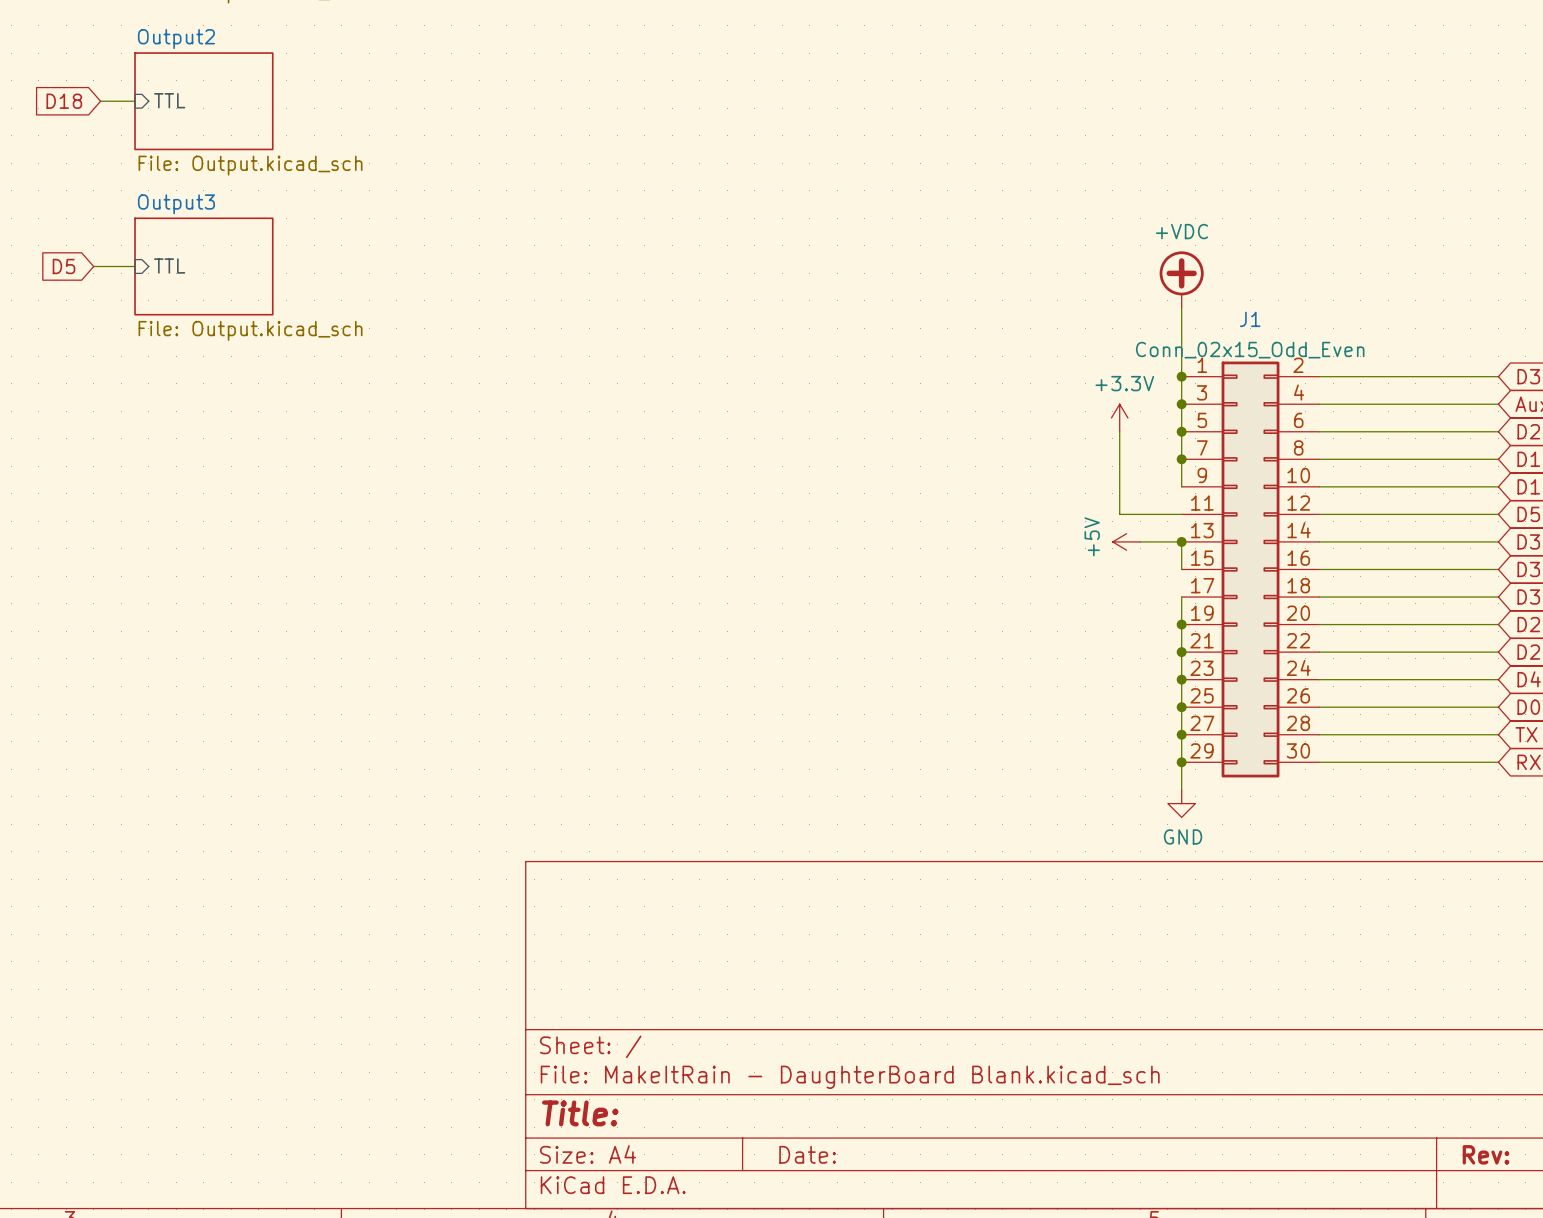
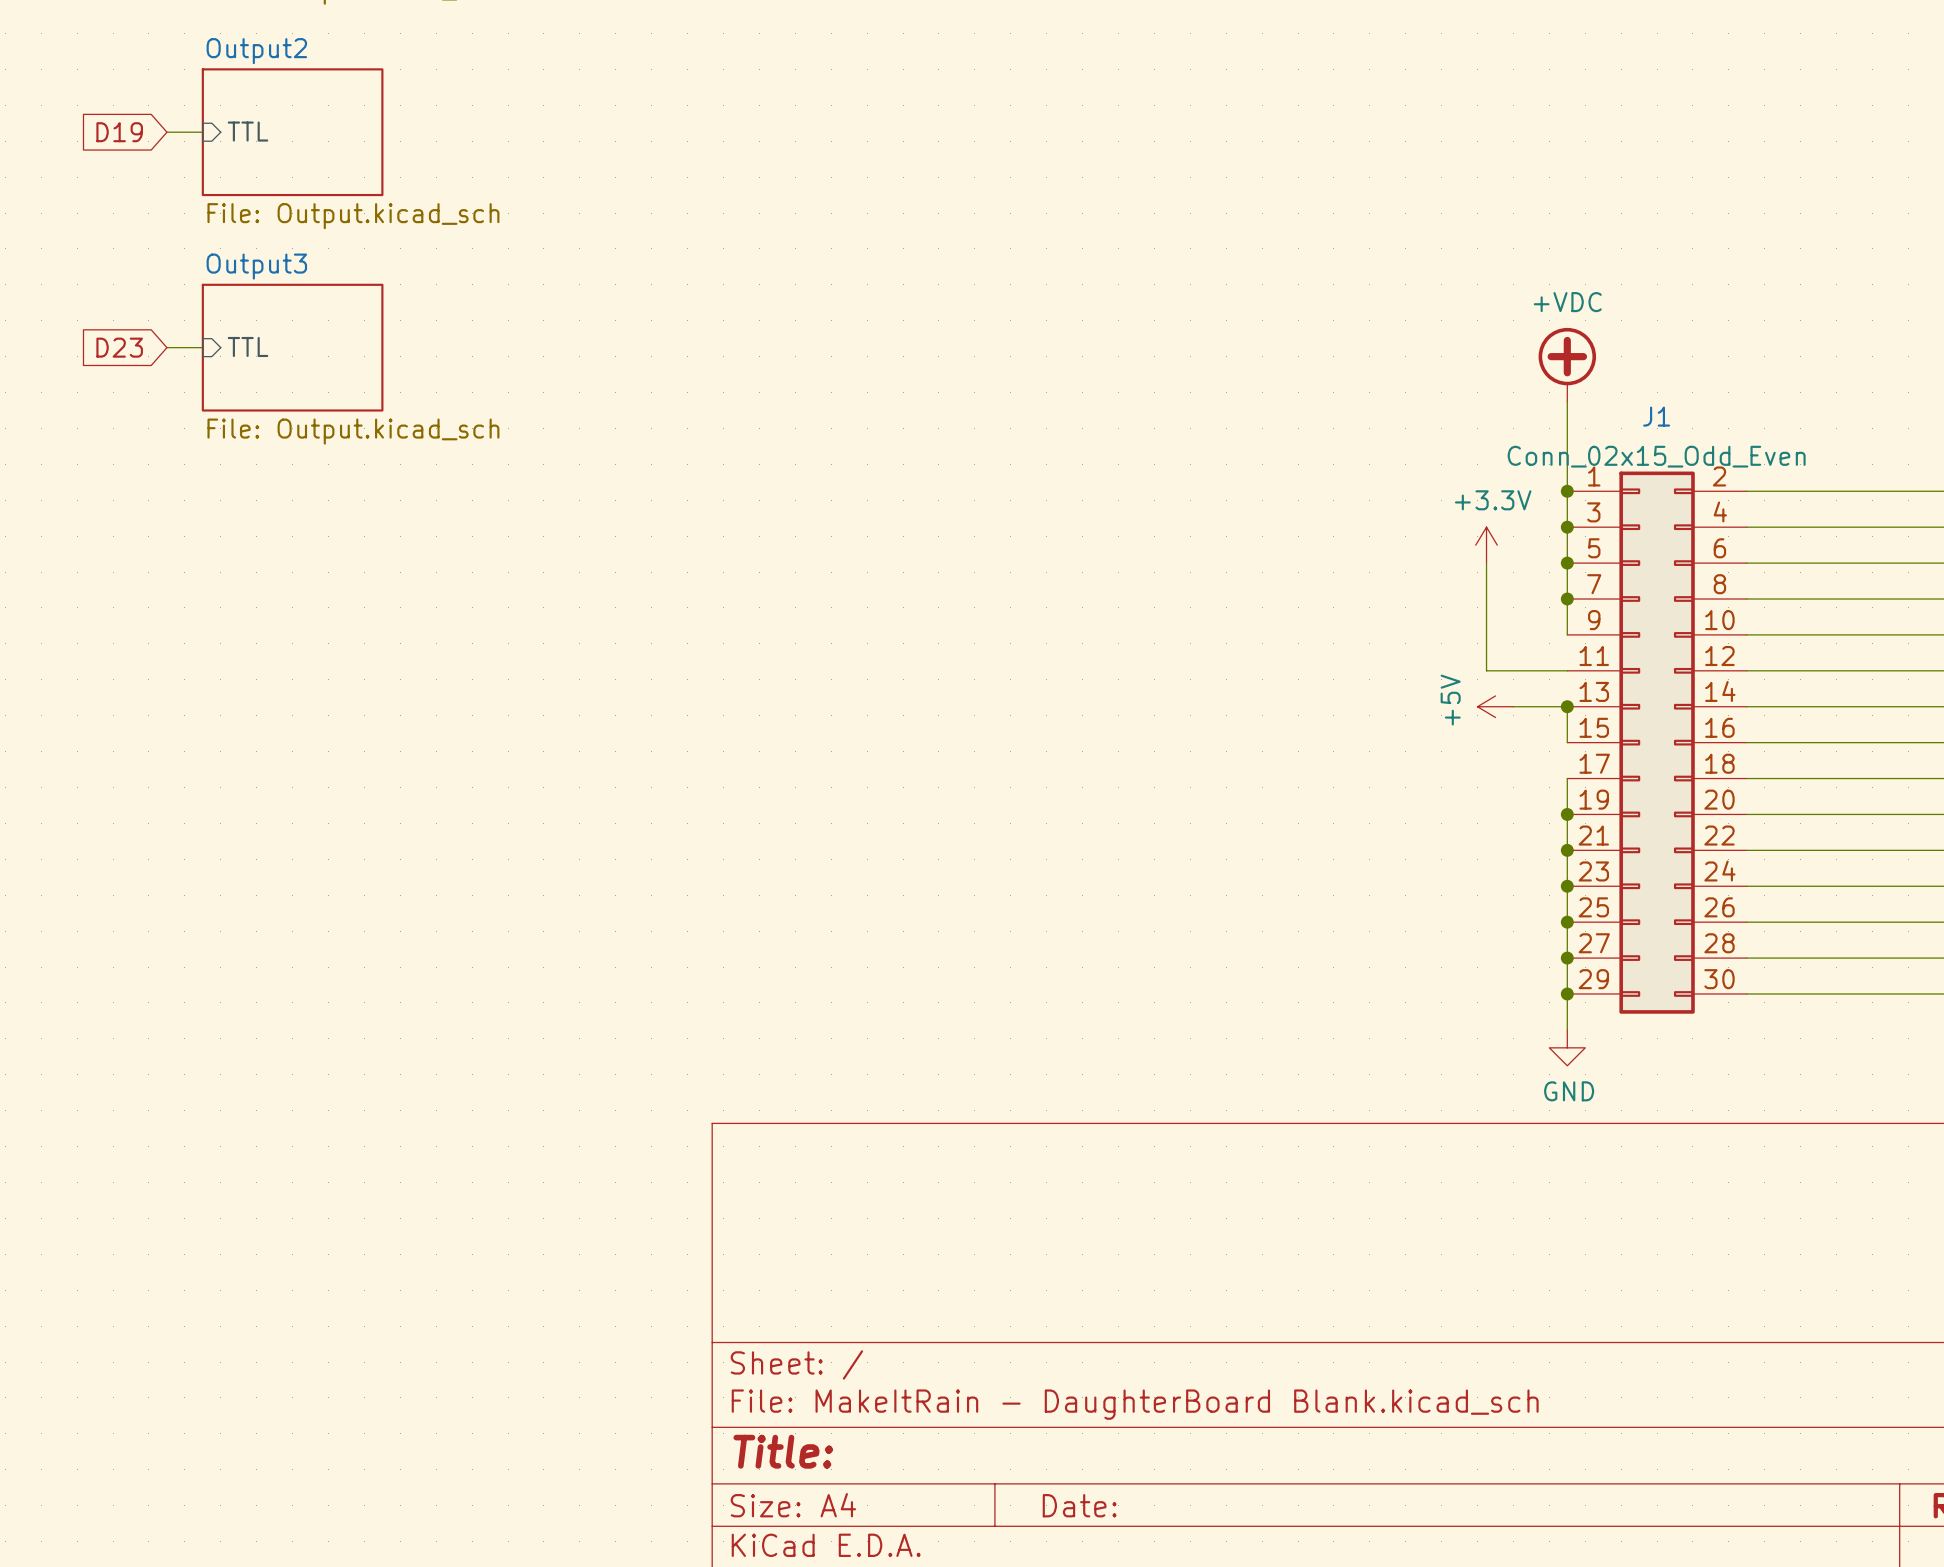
global label: D18 (64, 101) -> D19 (119, 132)
wire: (100, 101) (107, 101) -> none
global label: D5 (64, 266) -> none
global label: none -> D23 (119, 347)
wire: (93, 266) (107, 266) -> none

